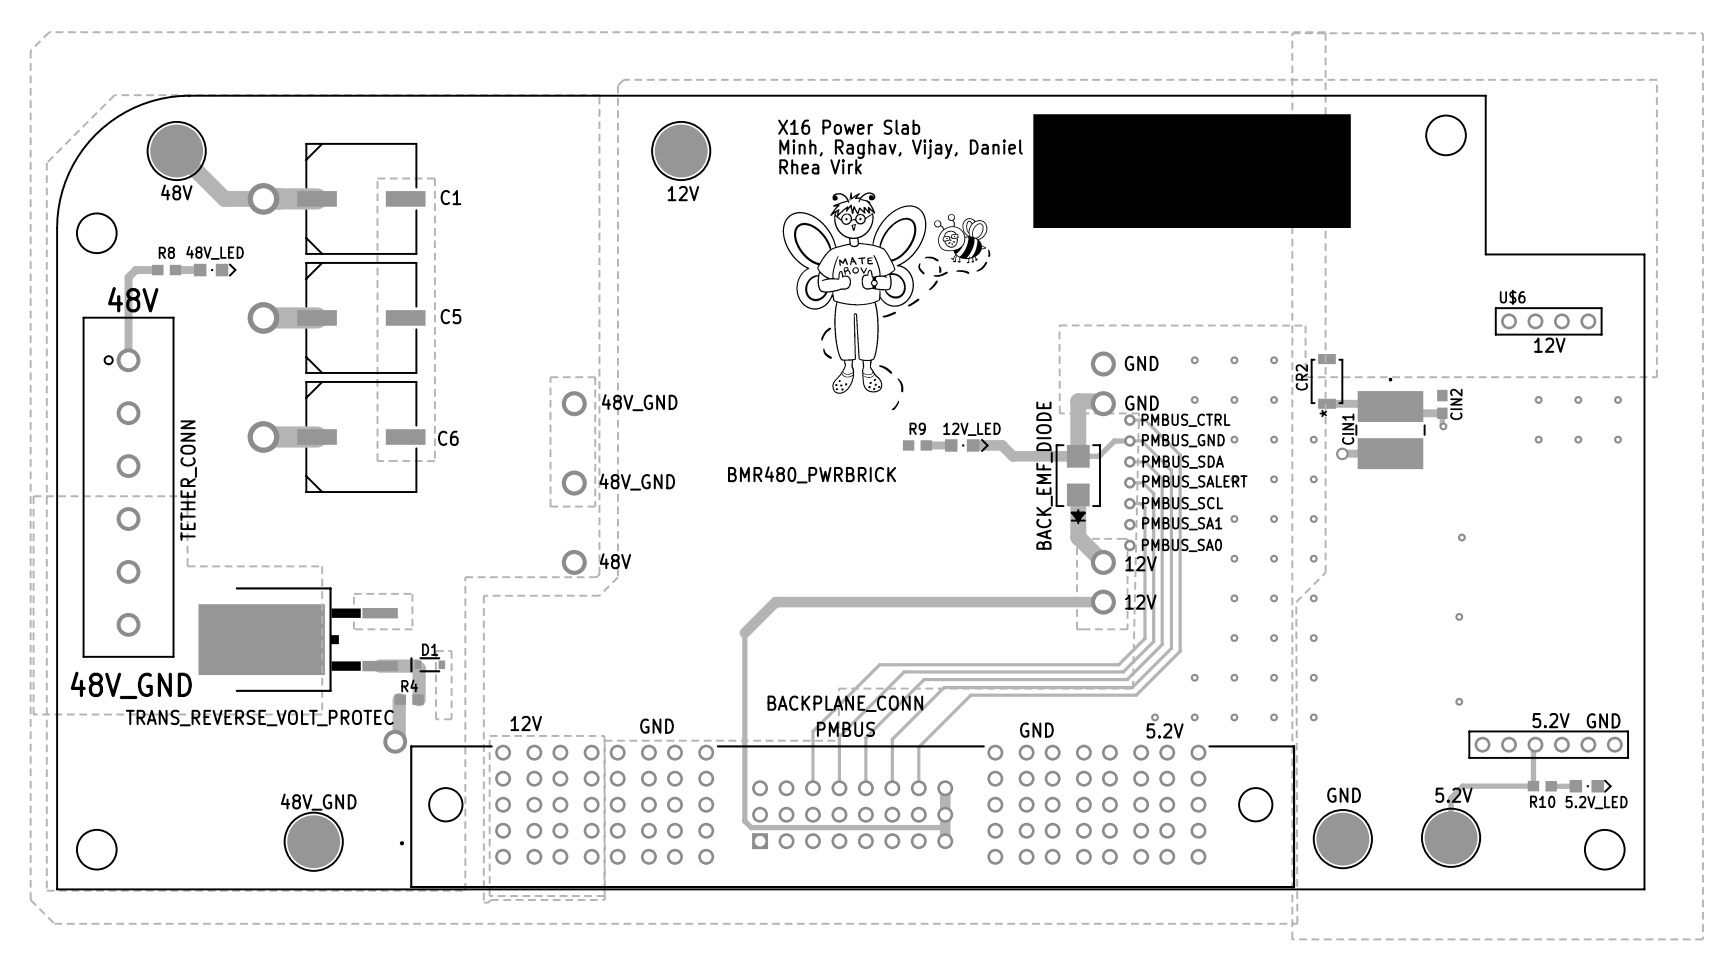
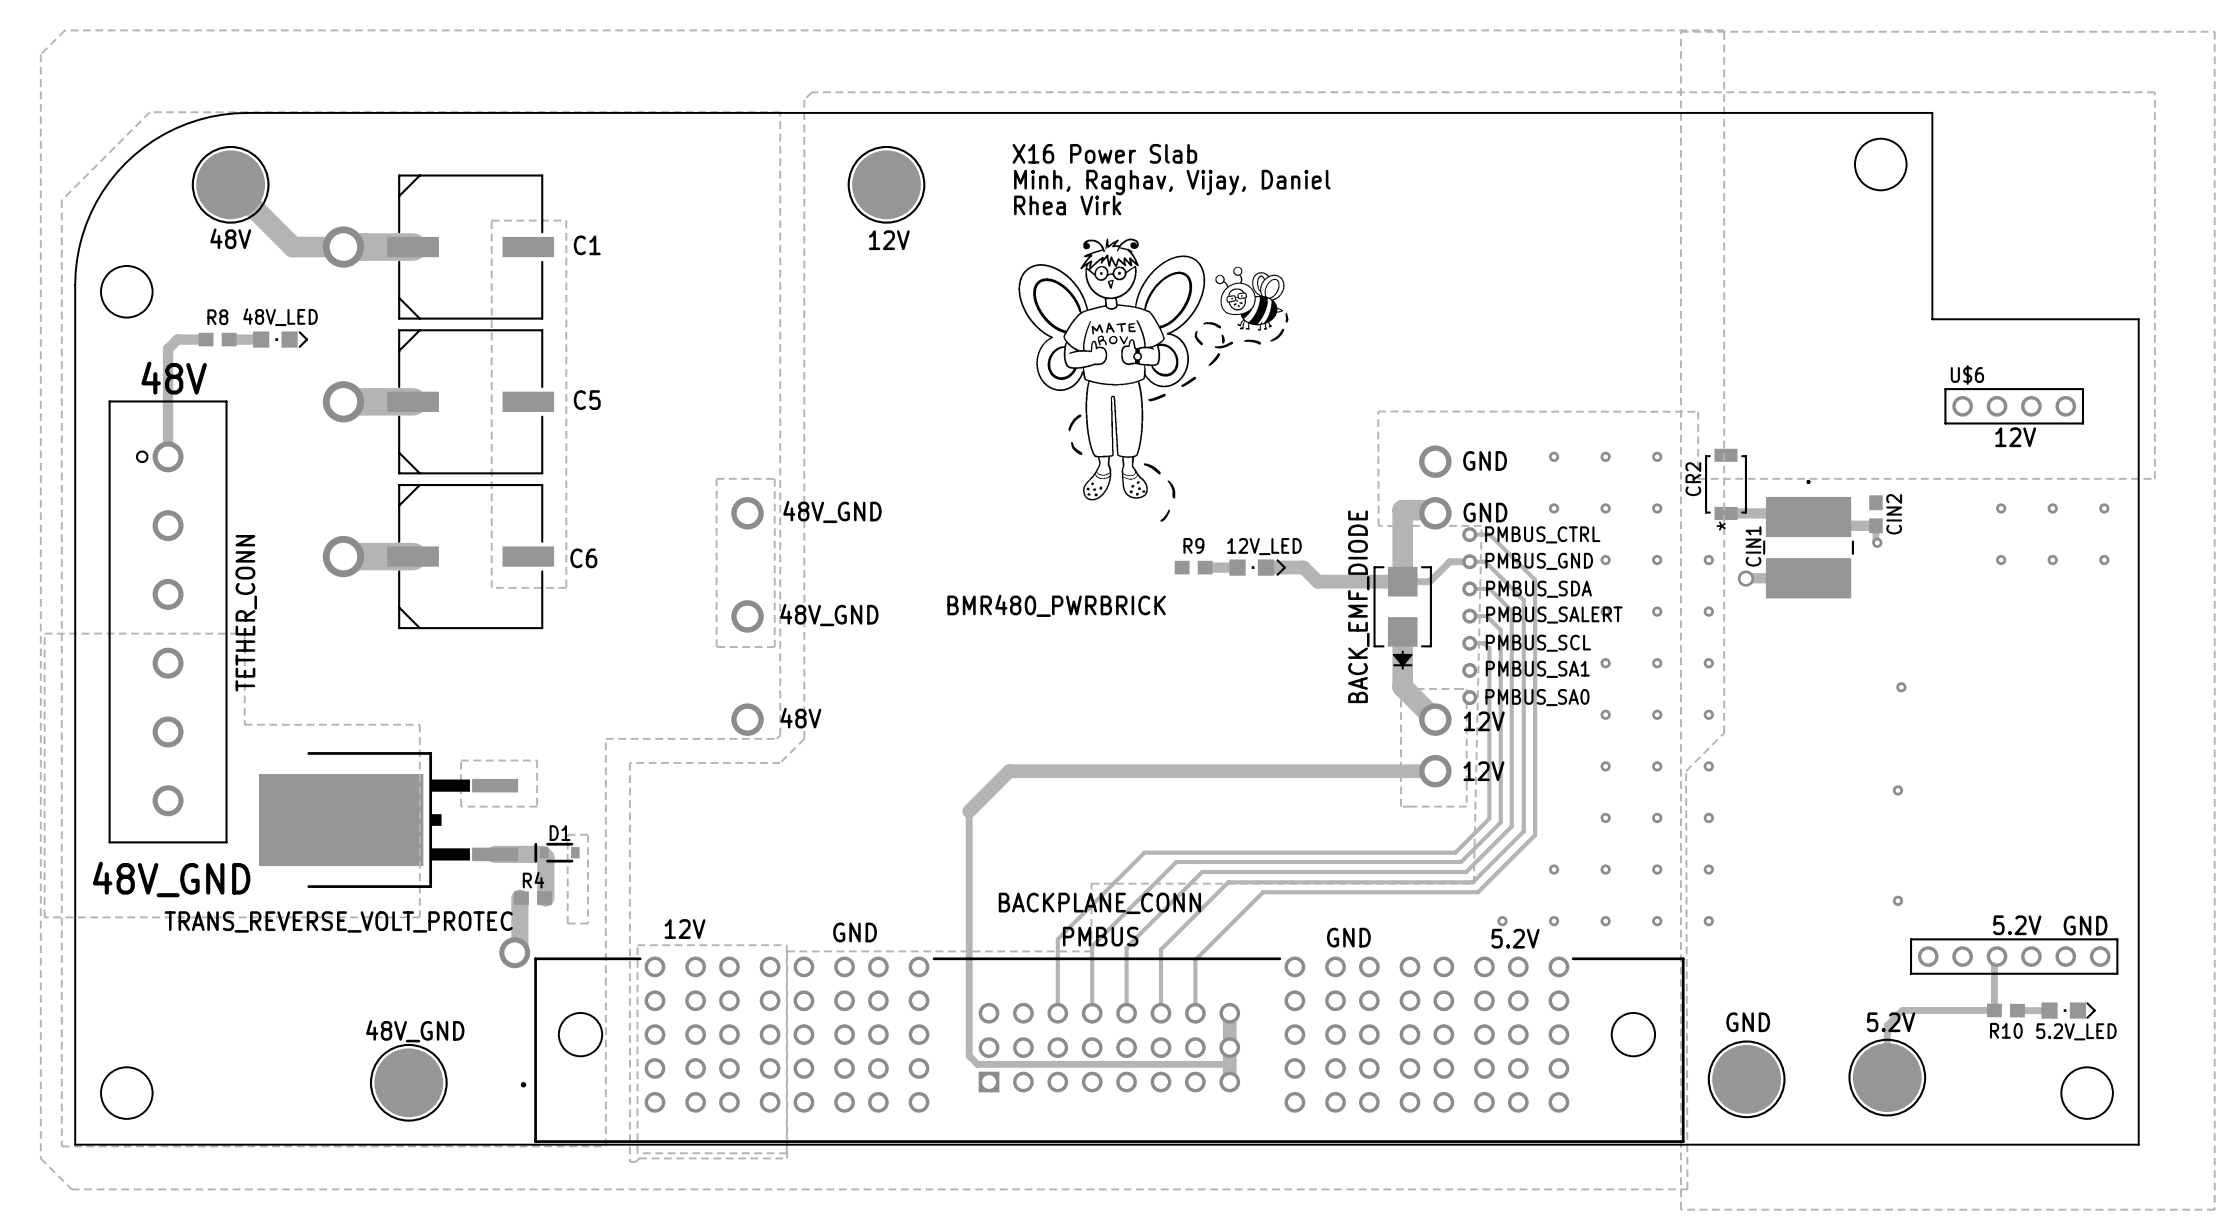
drawing: [1033, 114, 1351, 228] -> none

